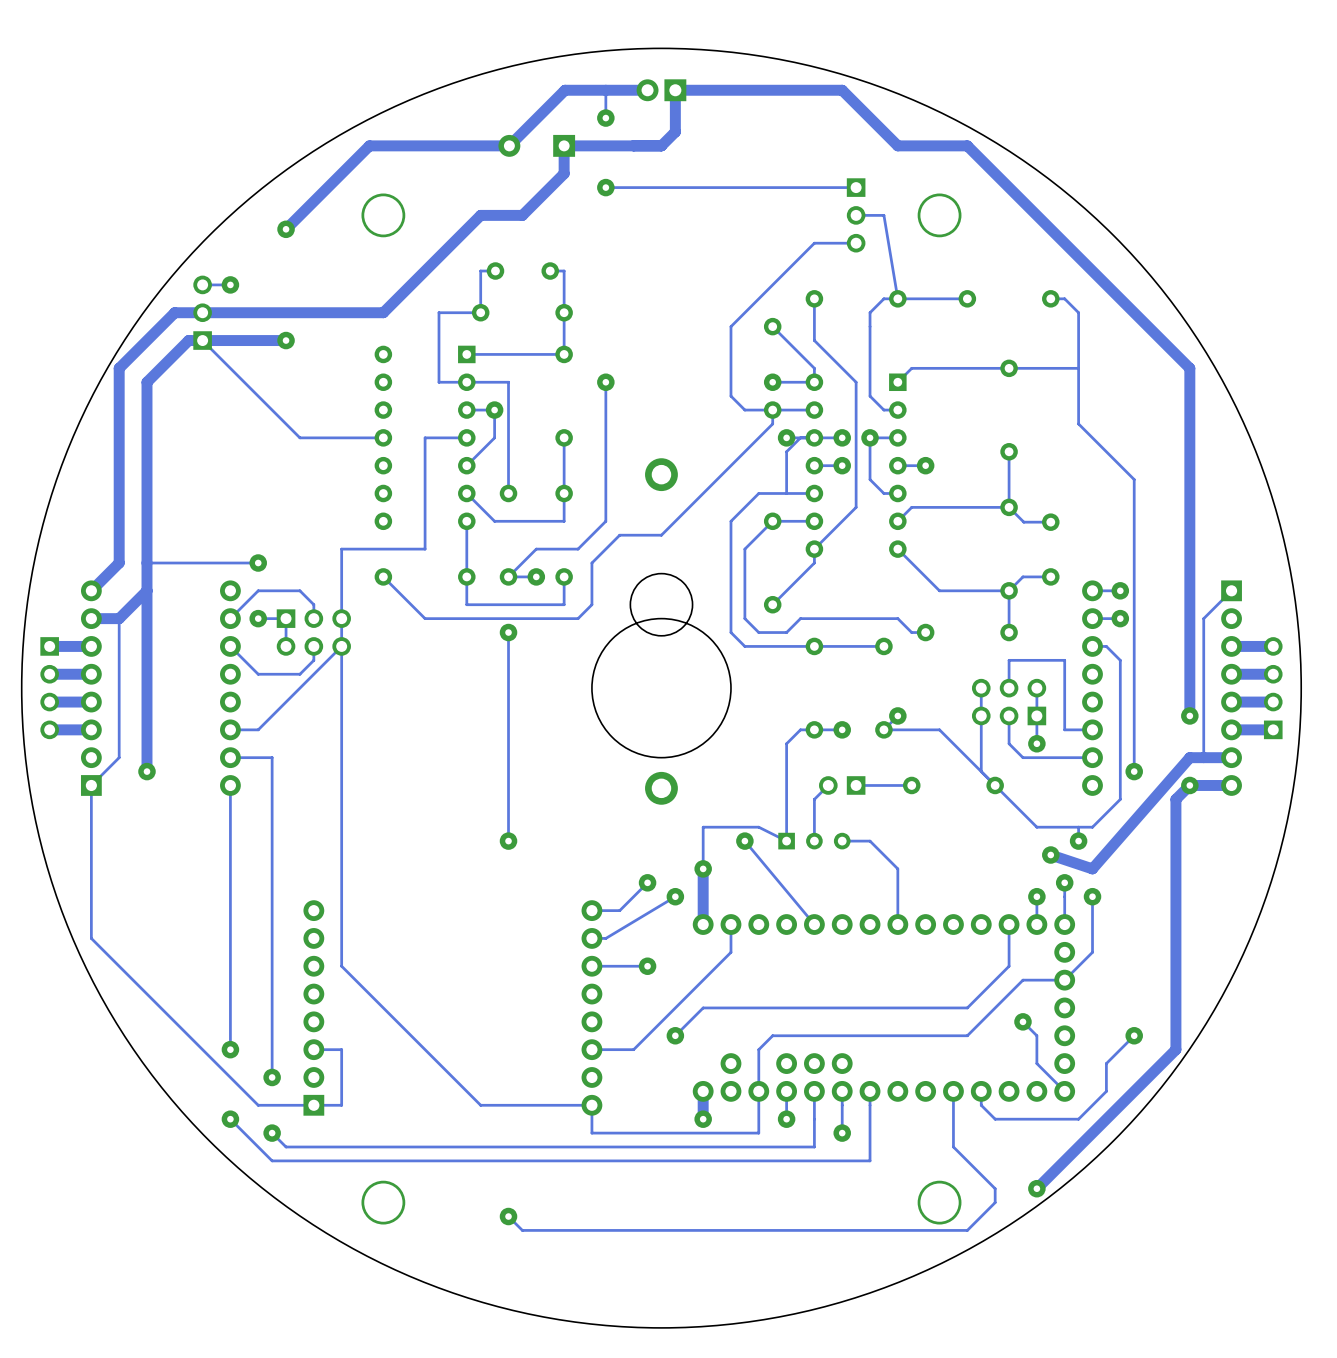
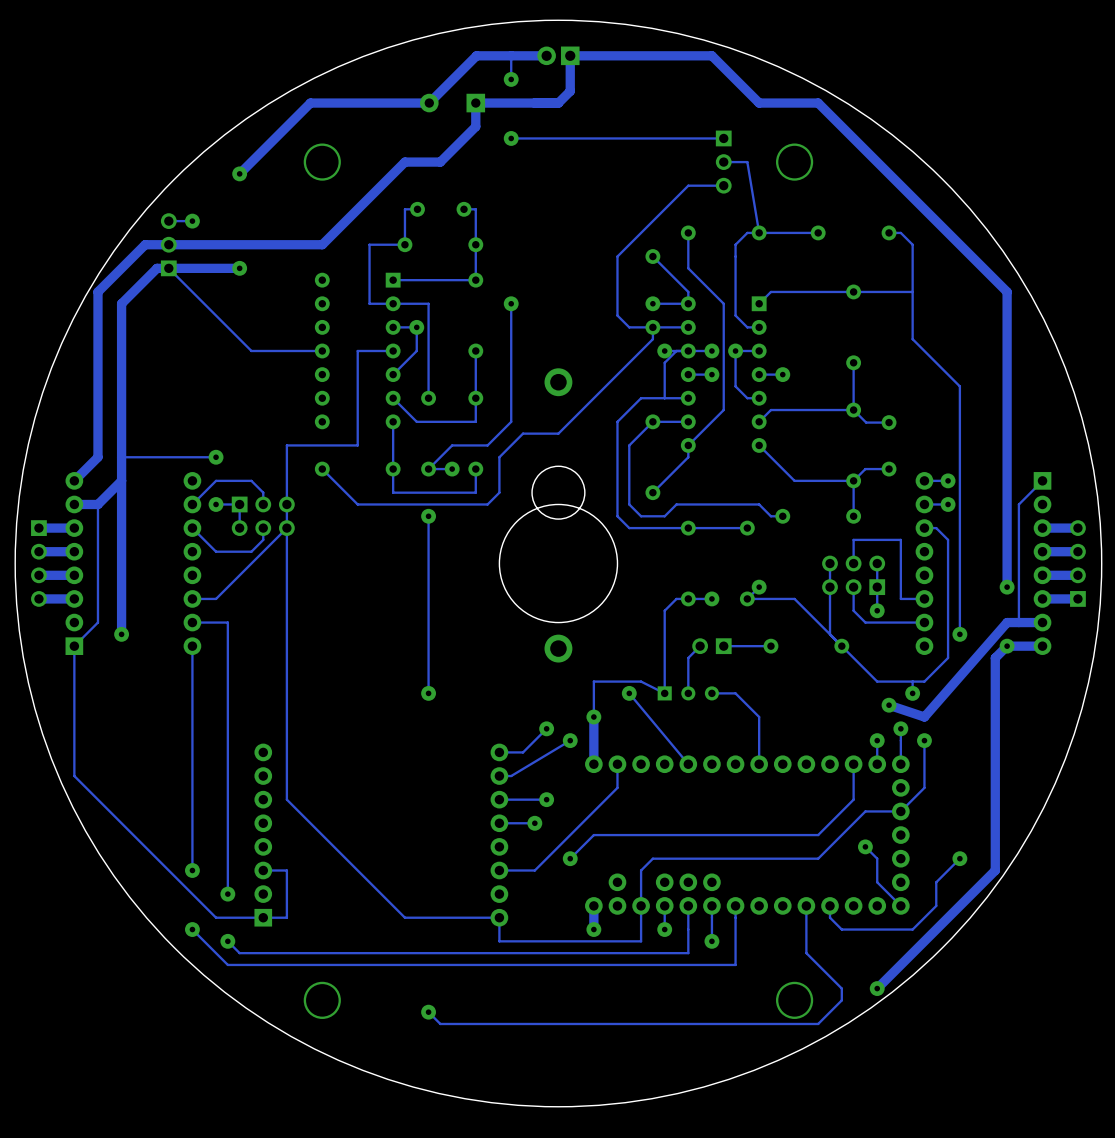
track: none -> (534, 823) (499, 823)
via: none -> (534, 823)

